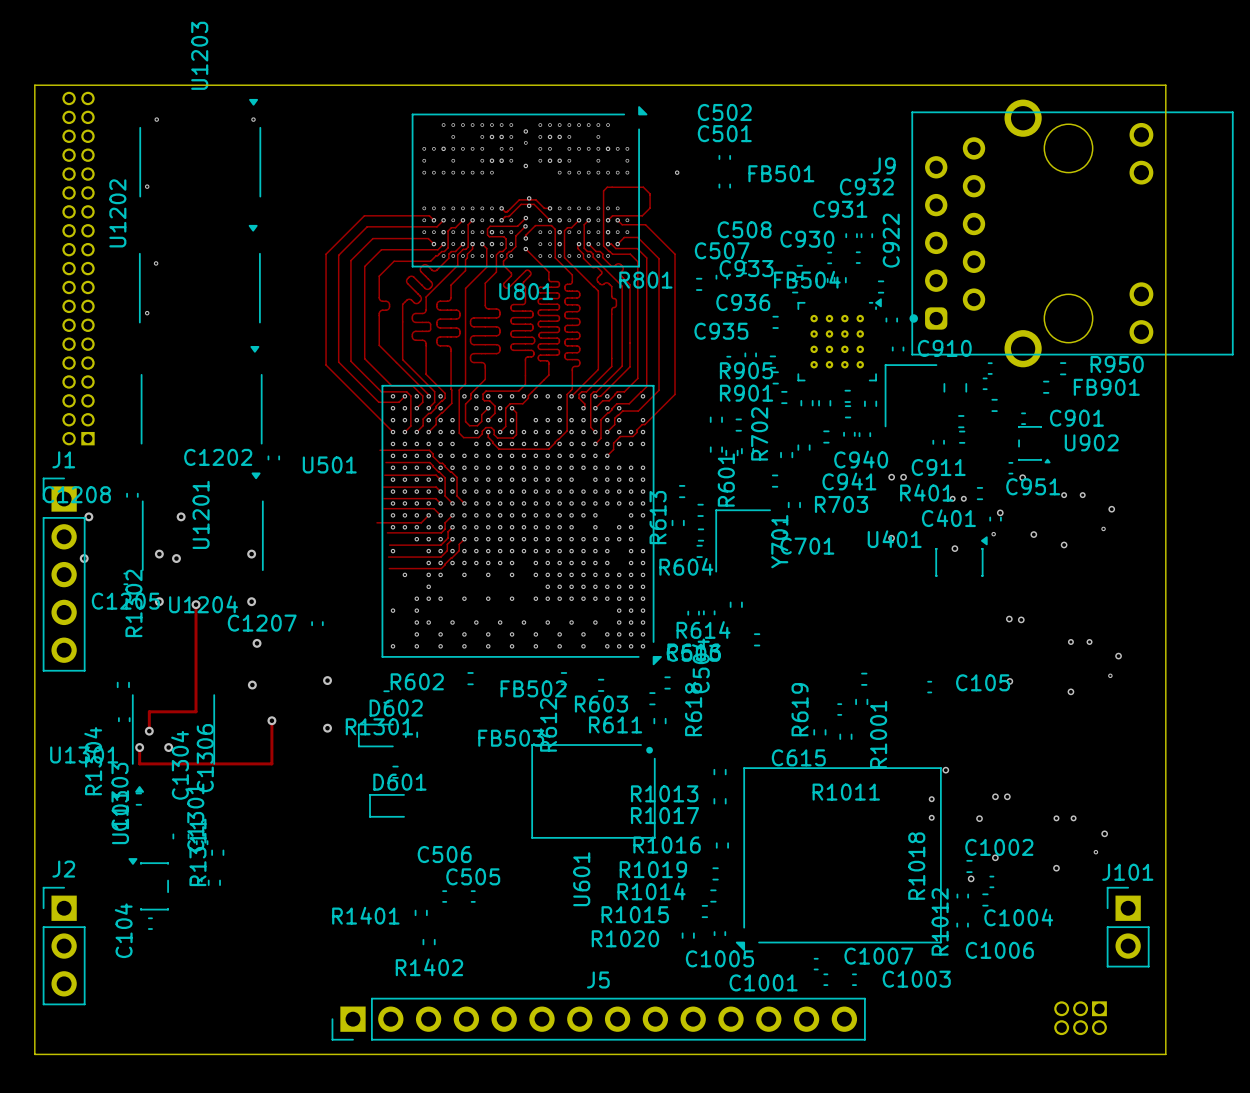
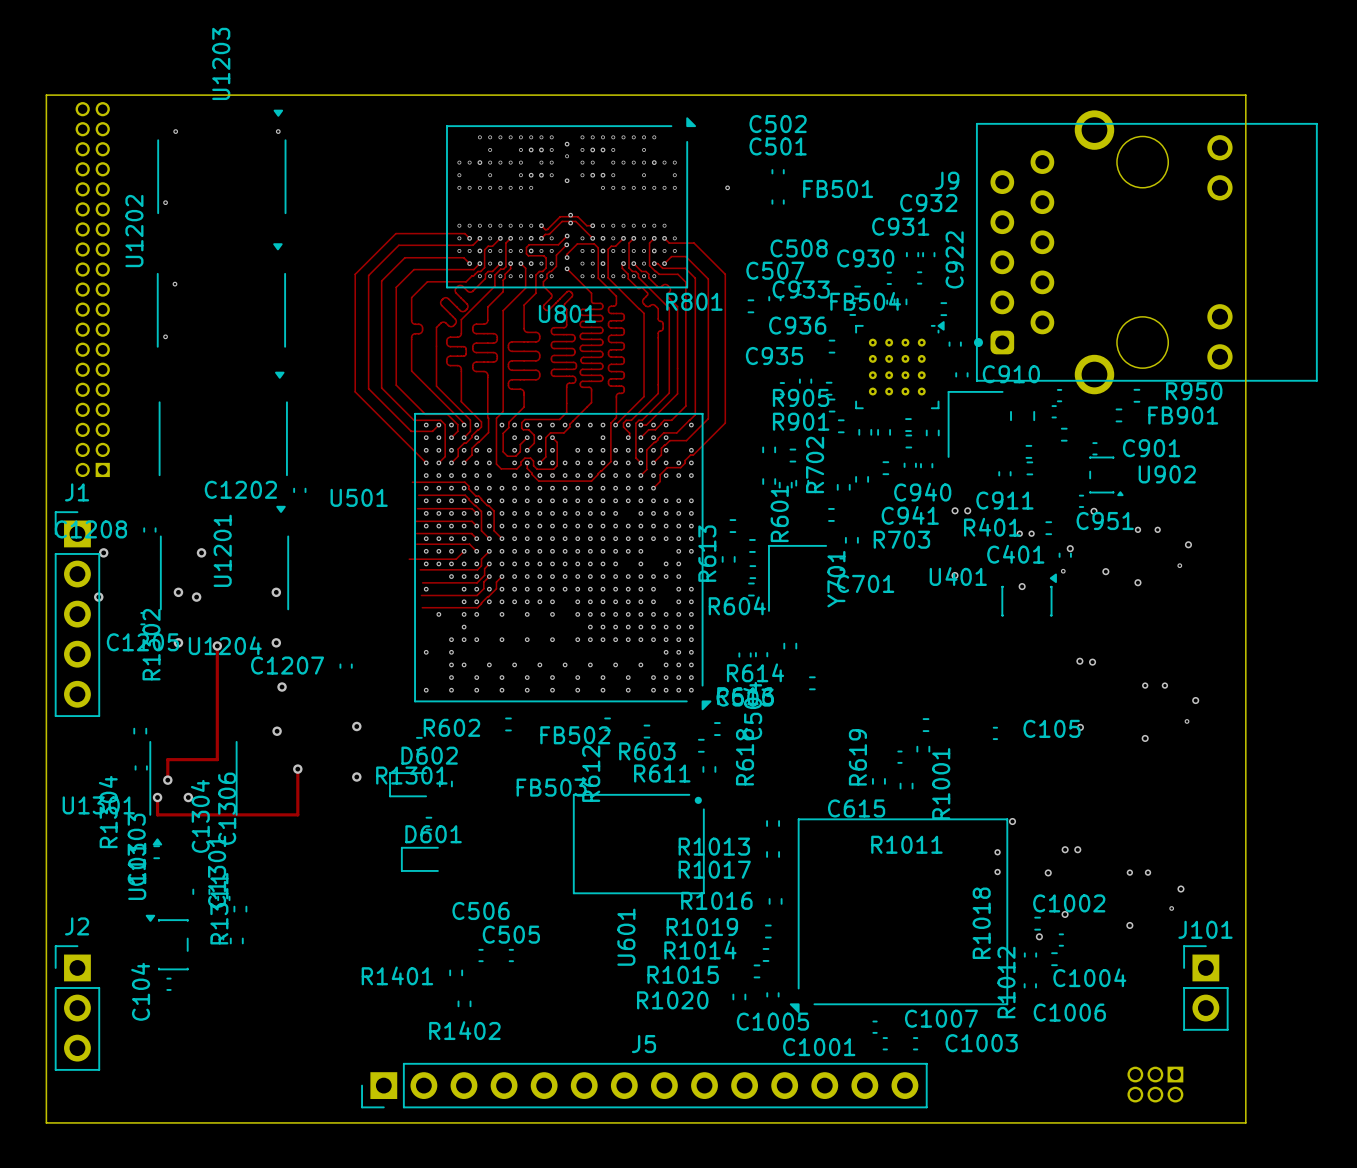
track: (608, 220) (612, 215) (642, 215) (650, 208) (650, 193) (643, 187) (607, 187) (603, 190) (603, 224) -> (654, 238) (649, 243)

